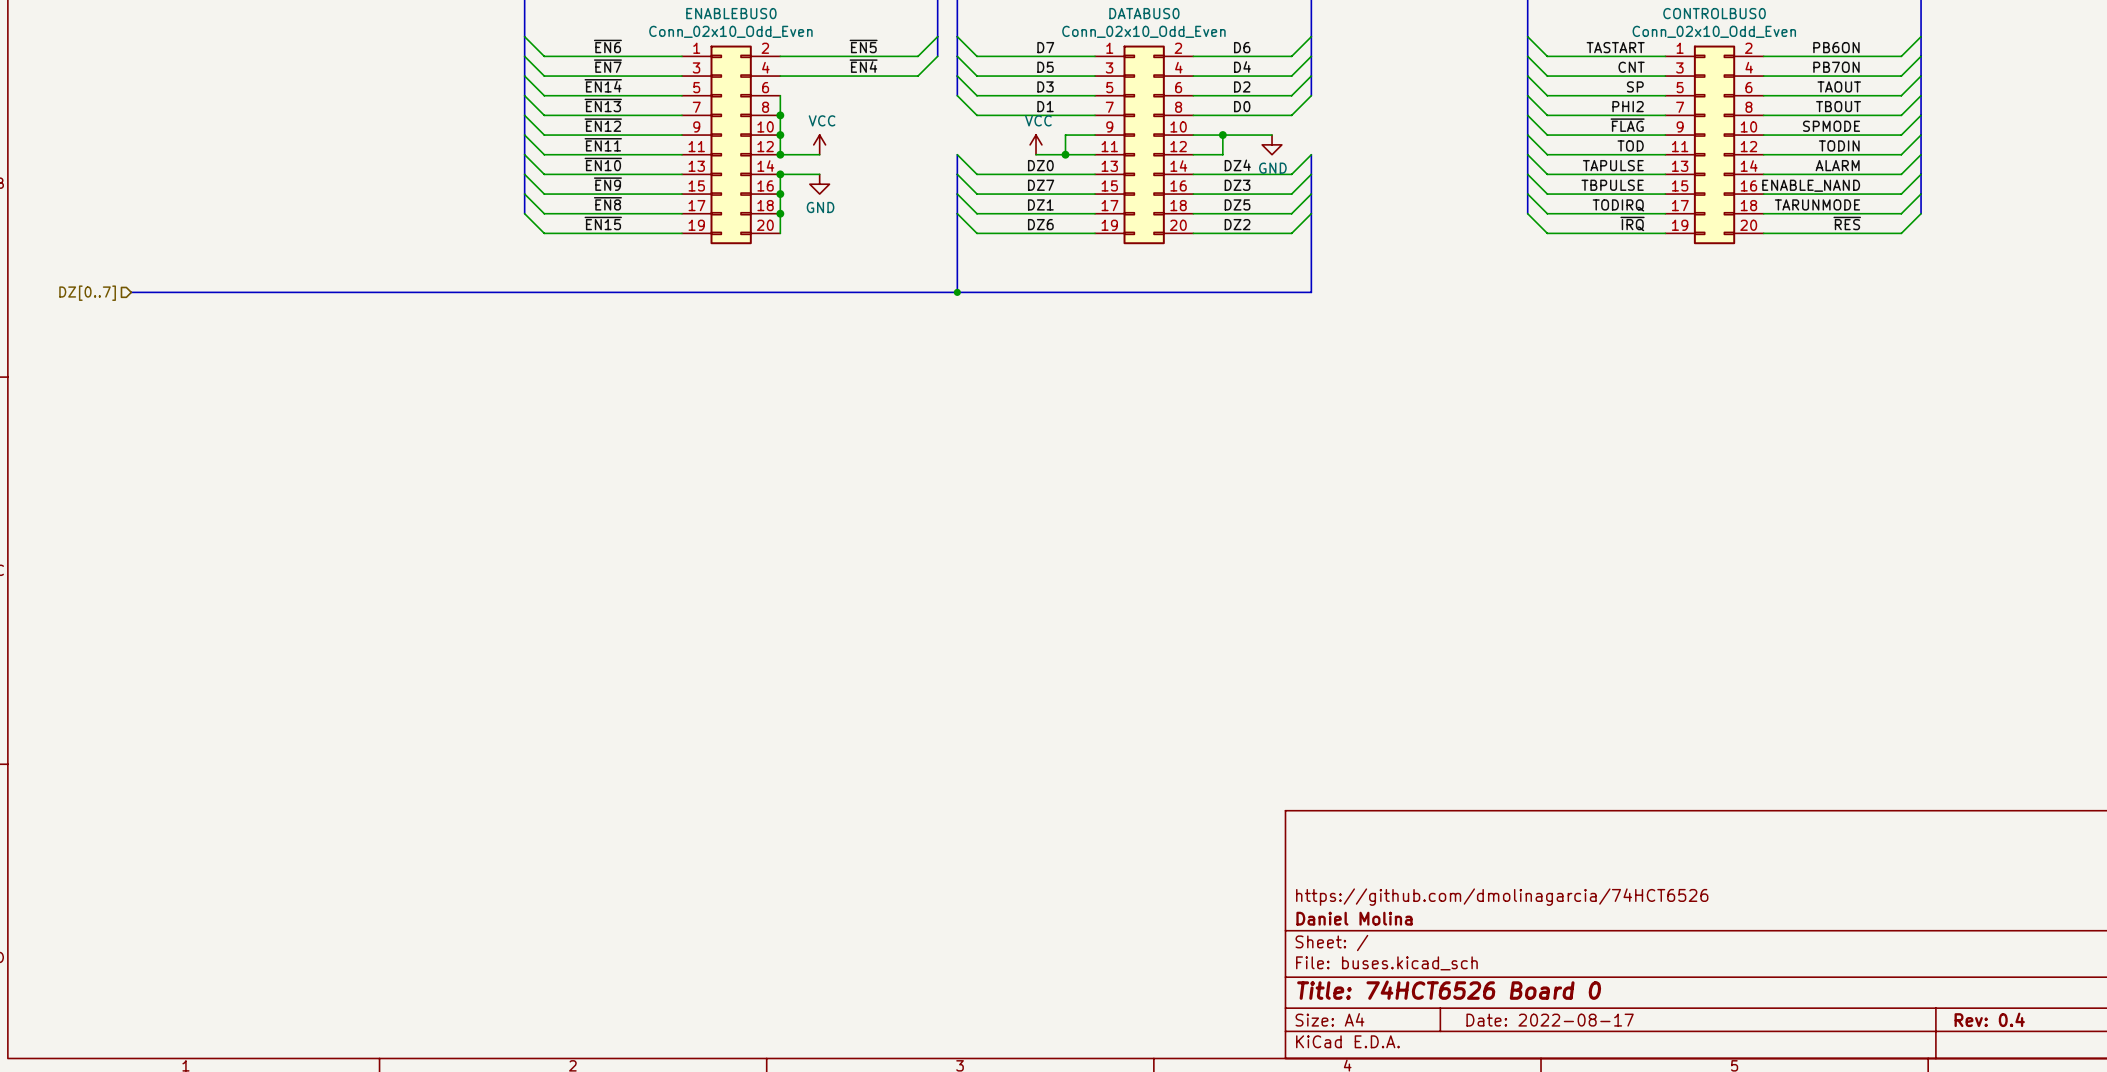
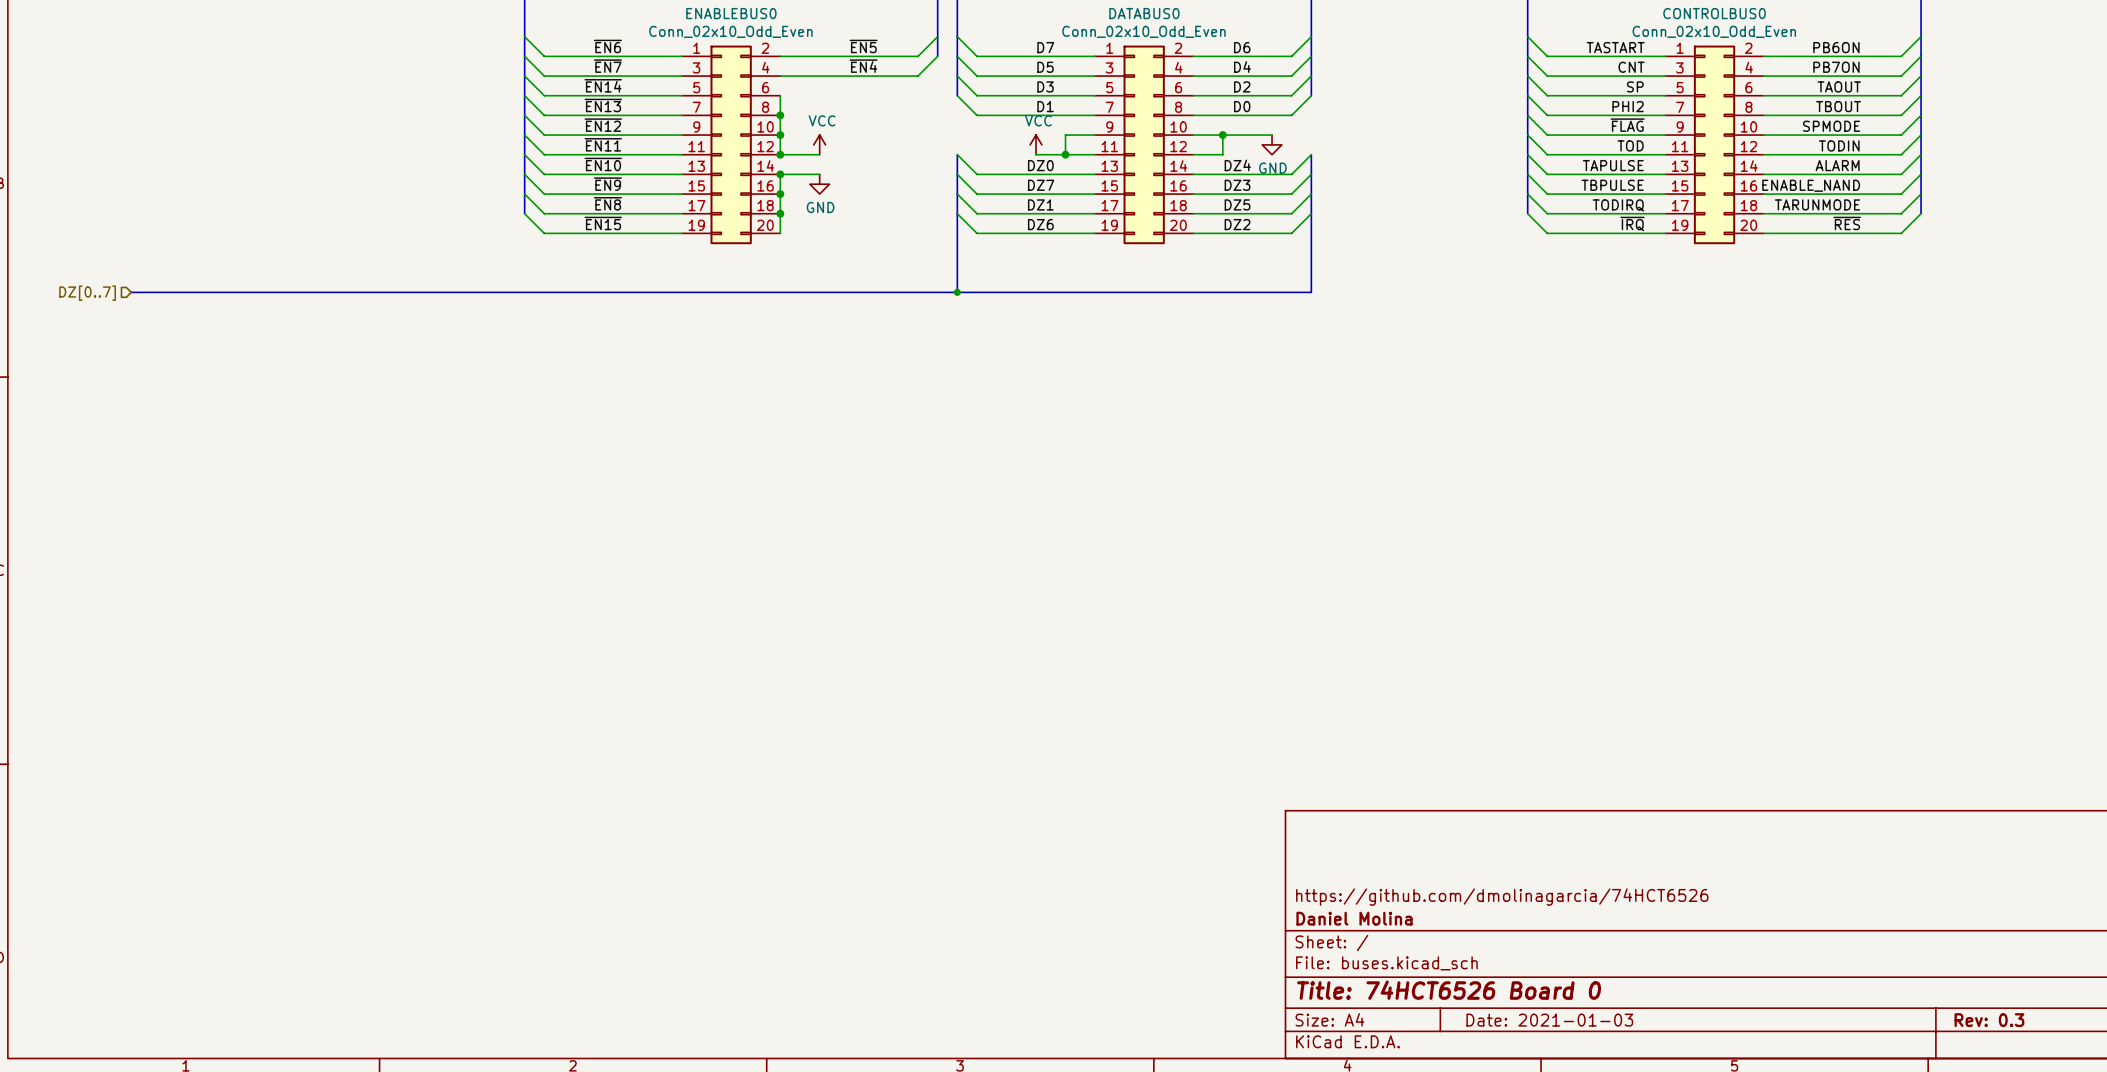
title block: Rev: 0.4 (1989, 1019) -> Rev: 0.3 (1989, 1020)
title block: Date: 2022-08-17 (1550, 1020) -> Date: 2021-01-03 (1549, 1020)

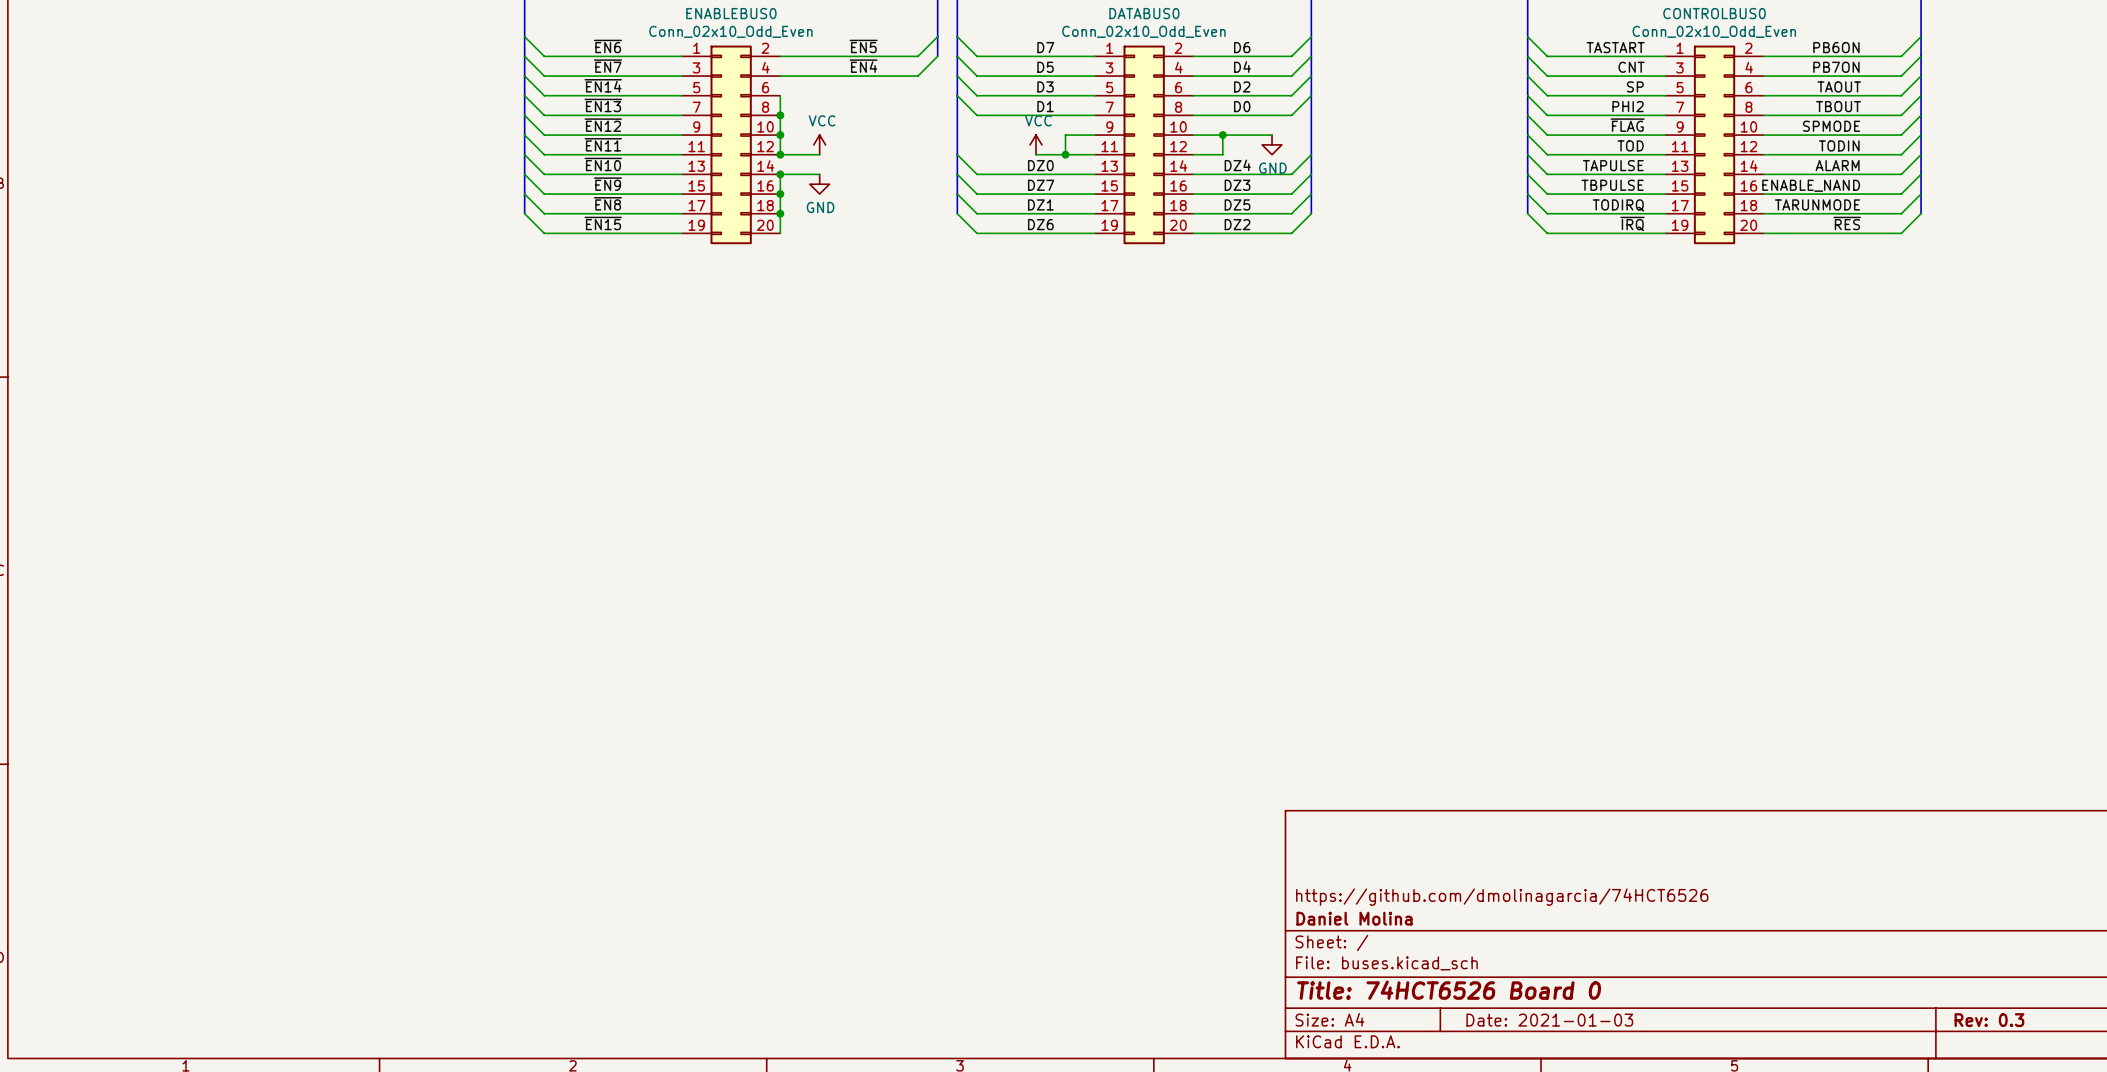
bus: none -> (957, 95) (957, 154)
bus: none -> (1311, 95) (1311, 154)
bus: (957, 213) (957, 292) -> none
bus: (1311, 213) (1311, 292) (131, 292) -> none
junction: (957, 292) -> none
hierarchical label: DZ[0..7] (87, 293) -> none

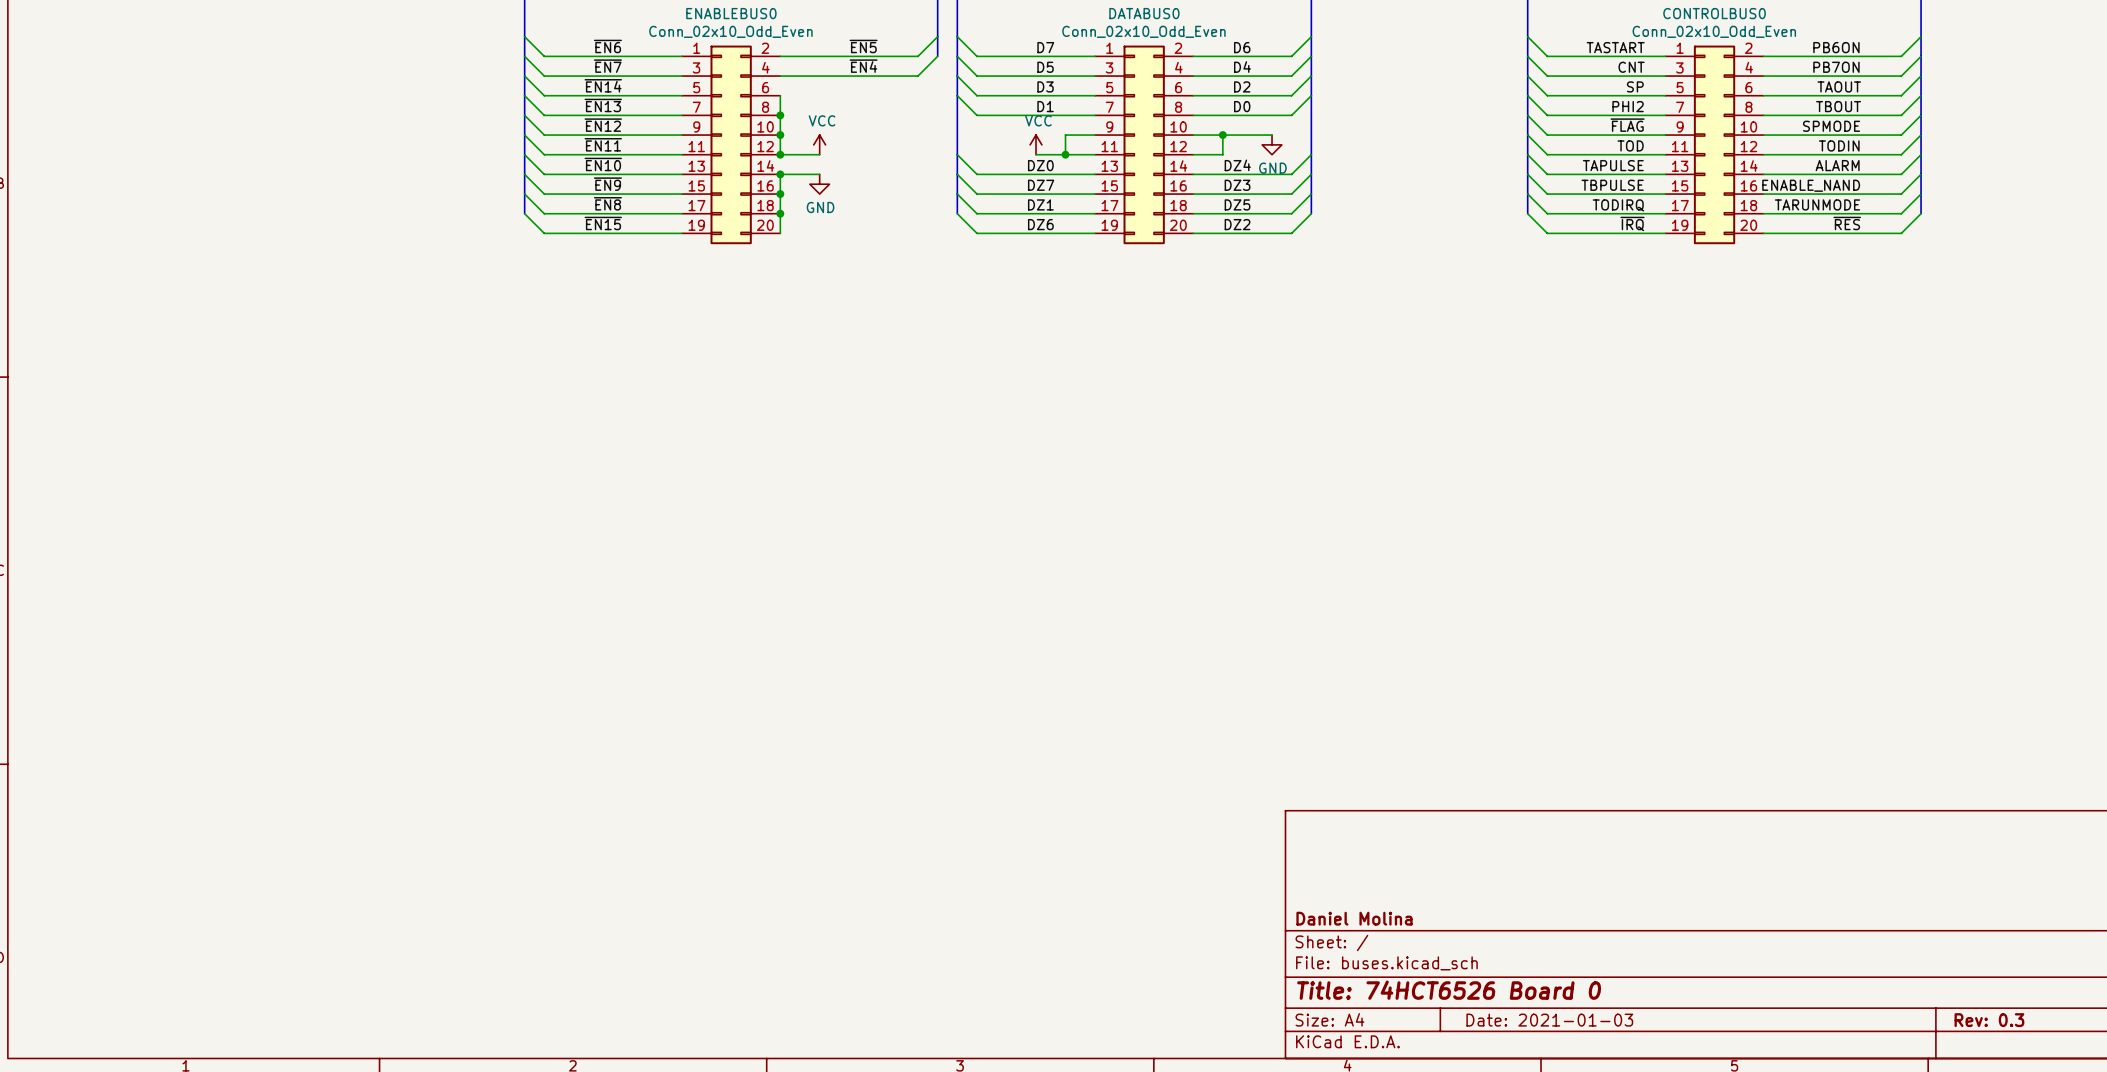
title block: https://github.com/dmolinagarcia/74HCT6526 (1502, 897) -> none

